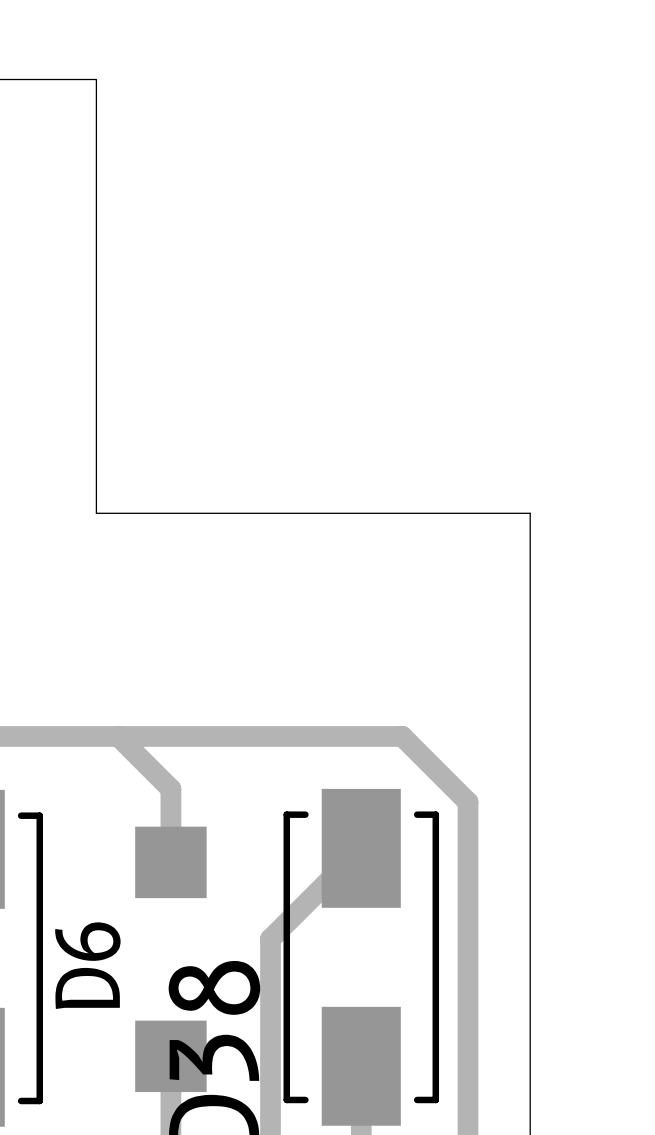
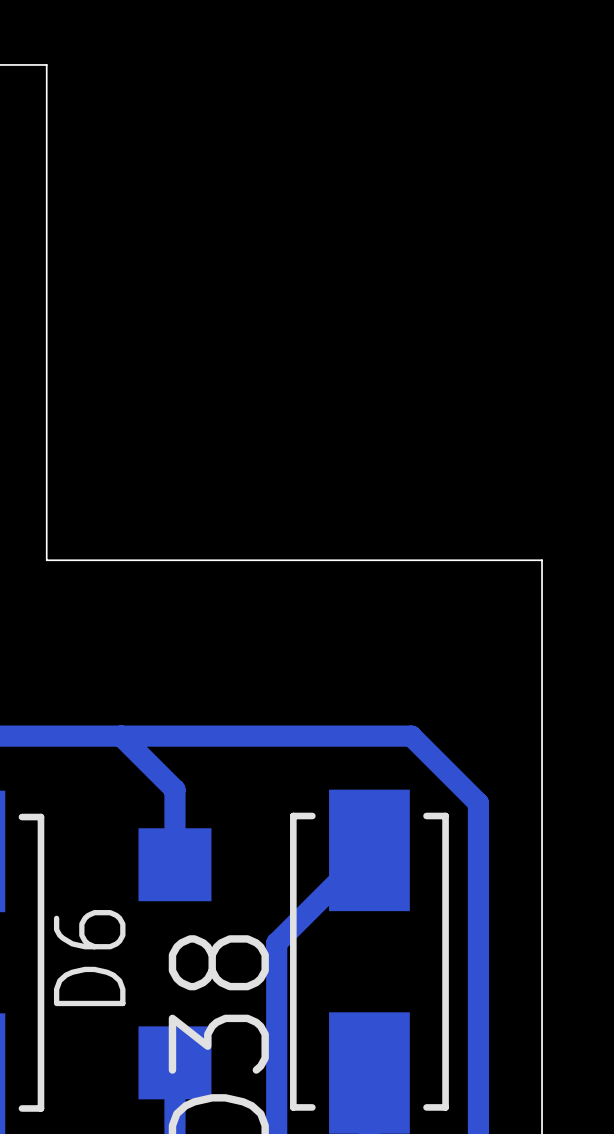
board edge: (45, 79) (96, 79) (96, 513) (530, 513) (530, 564) -> (46, 64) (46, 560) (542, 560)

